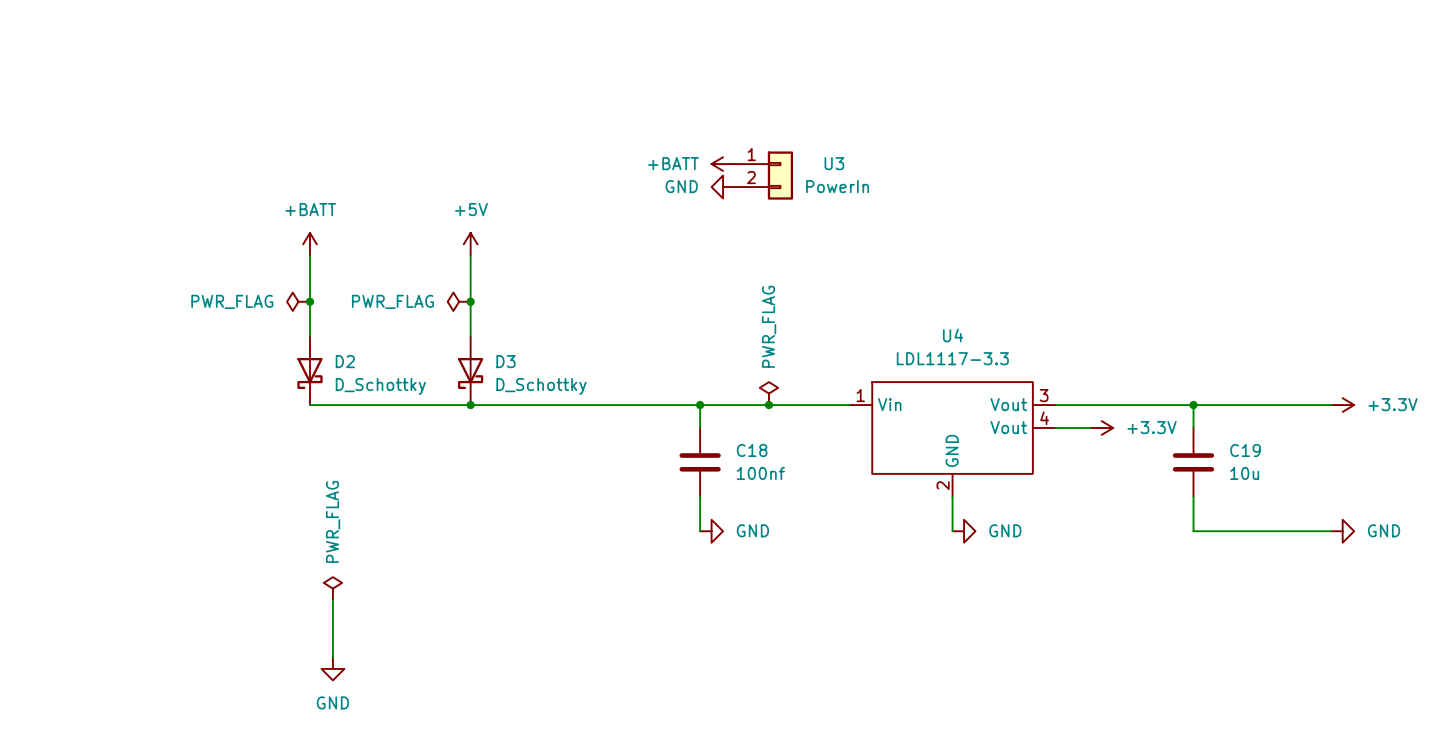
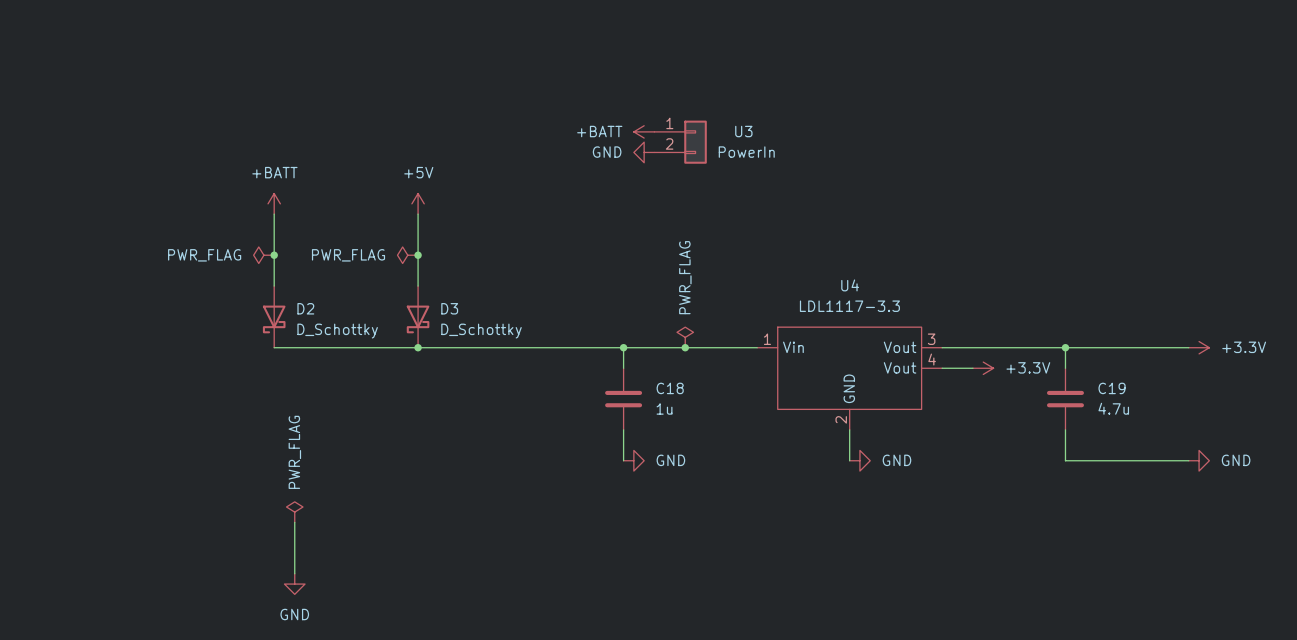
C18 value: 100nf (760, 473) -> 1u (664, 408)
C19 value: 10u (1244, 473) -> 4.7u (1113, 408)

